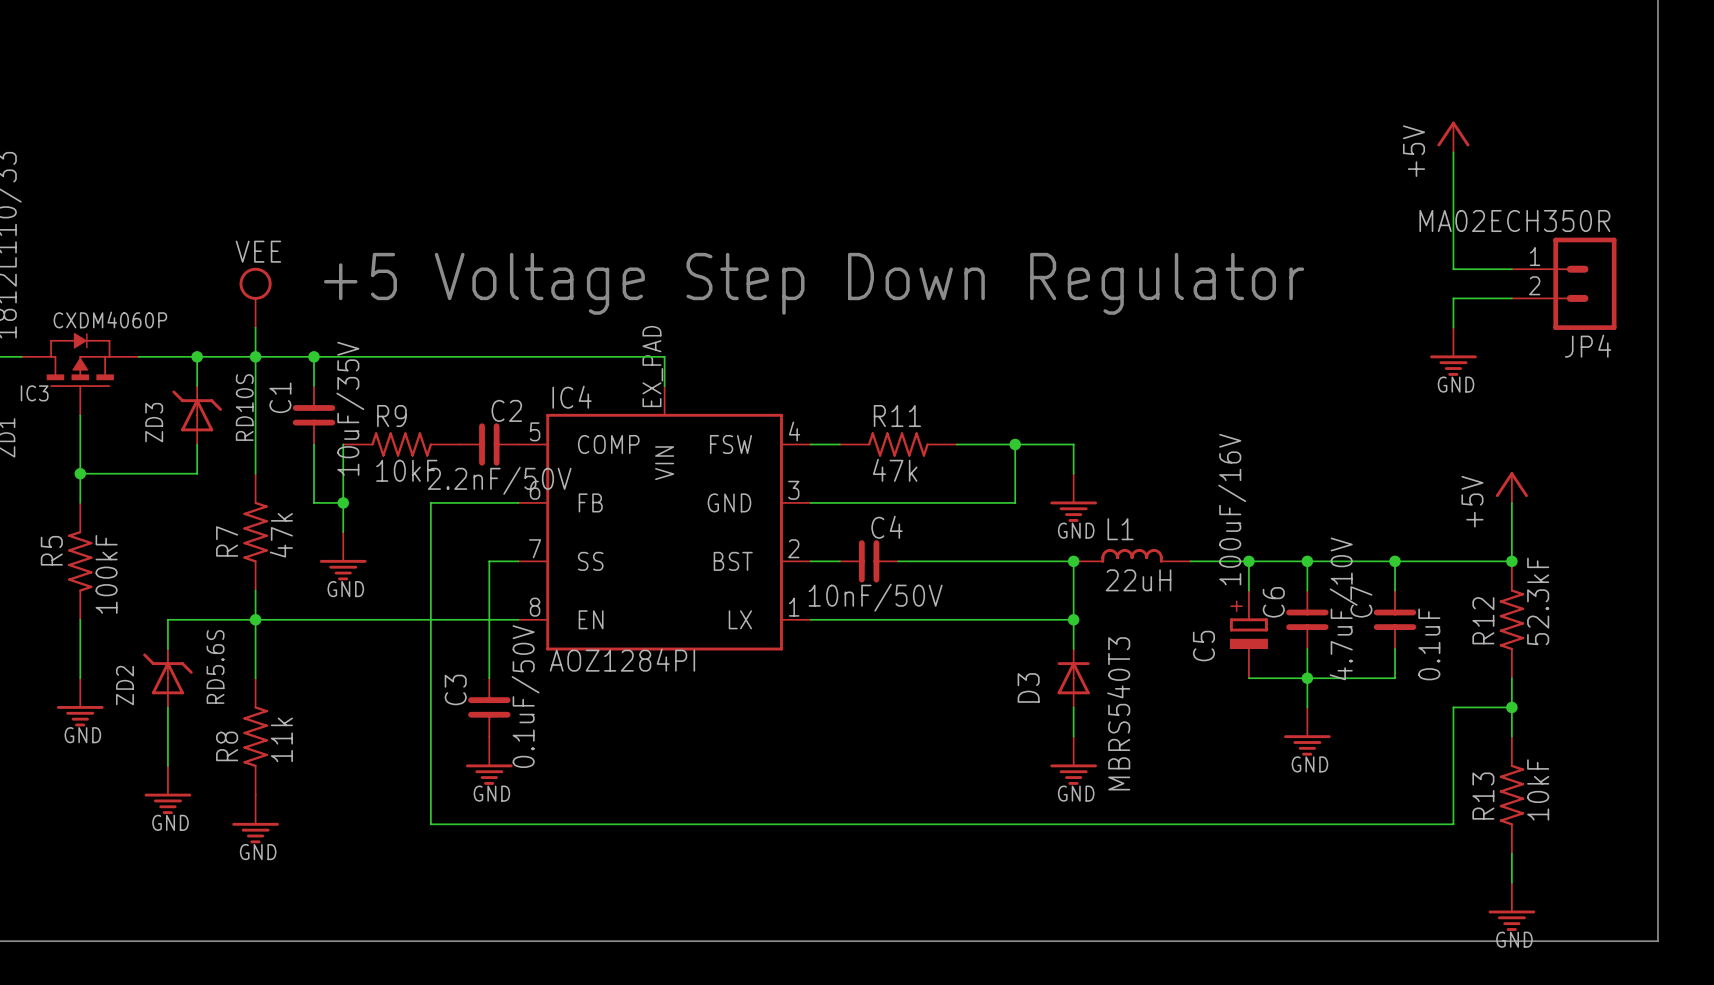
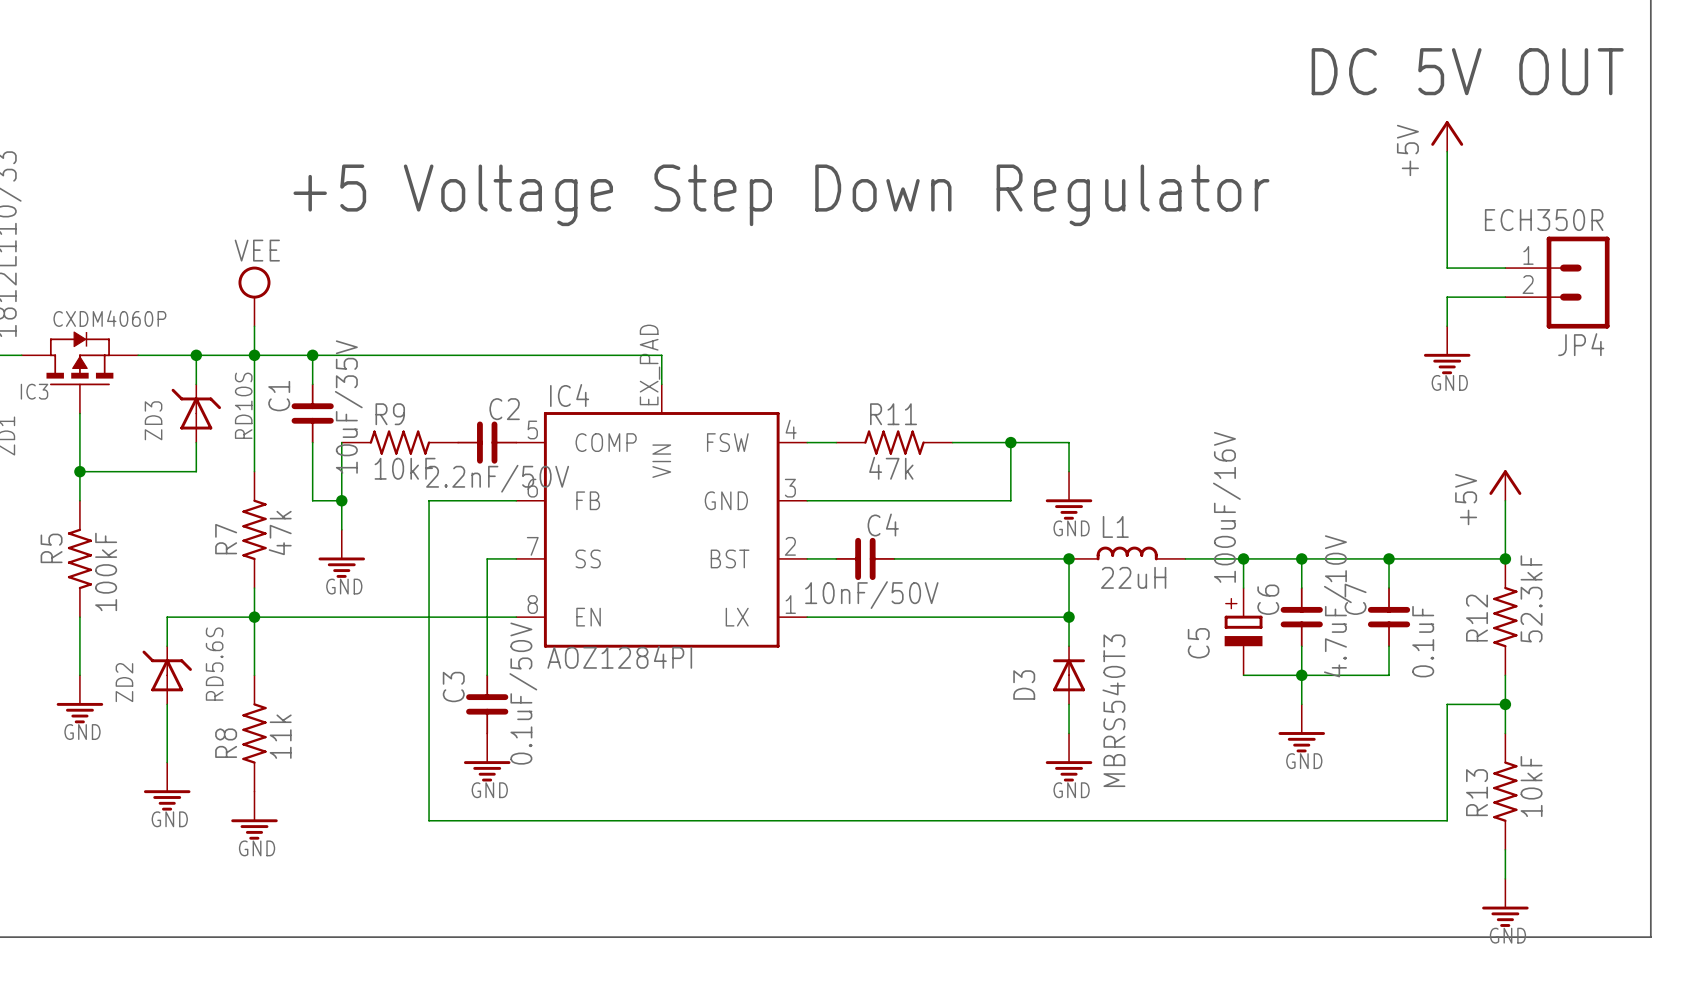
text: none -> DC 5V OUT (1467, 71)
JP4 value: MA02ECH350R (1514, 220) -> ECH350R (1544, 220)
text position: +5 Voltage Step Down Regulator (814, 283) -> +5 Voltage Step Down Regulator (781, 195)

